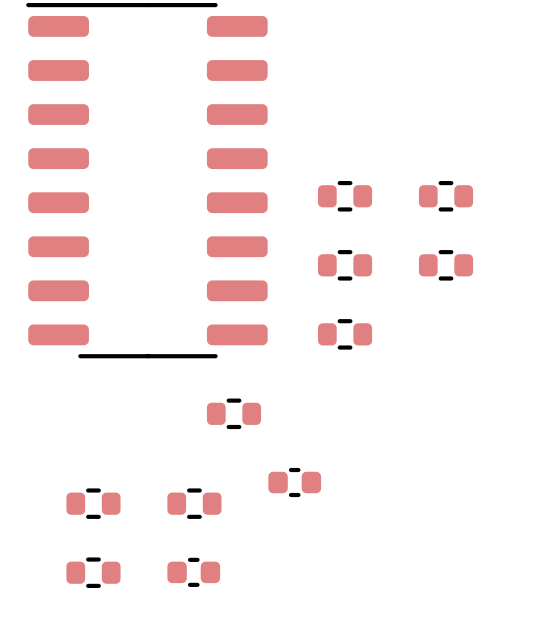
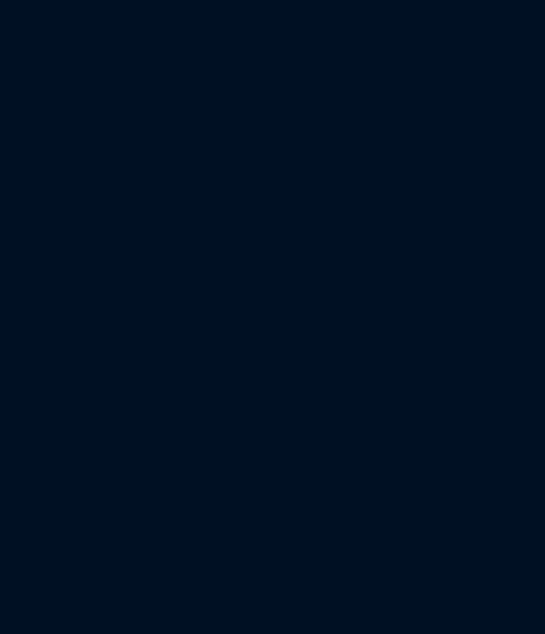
part: (146, 180) -> none
part: (345, 196) -> none
part: (445, 196) -> none
part: (345, 265) -> none
part: (445, 265) -> none
part: (345, 334) -> none
part: (233, 413) -> none
part: (294, 482) -> none
part: (93, 503) -> none
part: (194, 503) -> none
part: (93, 572) -> none
part: (193, 572) -> none

